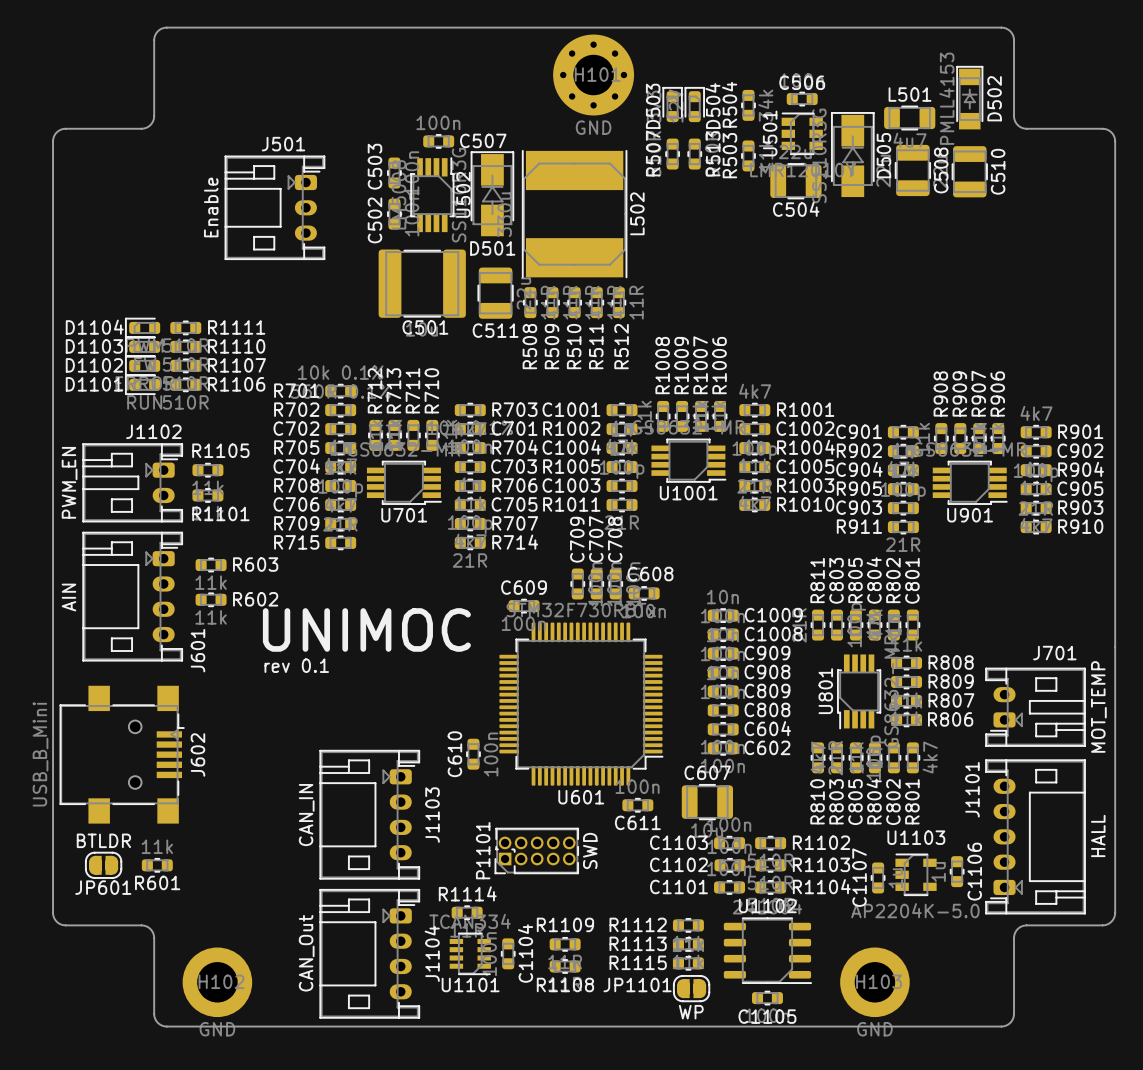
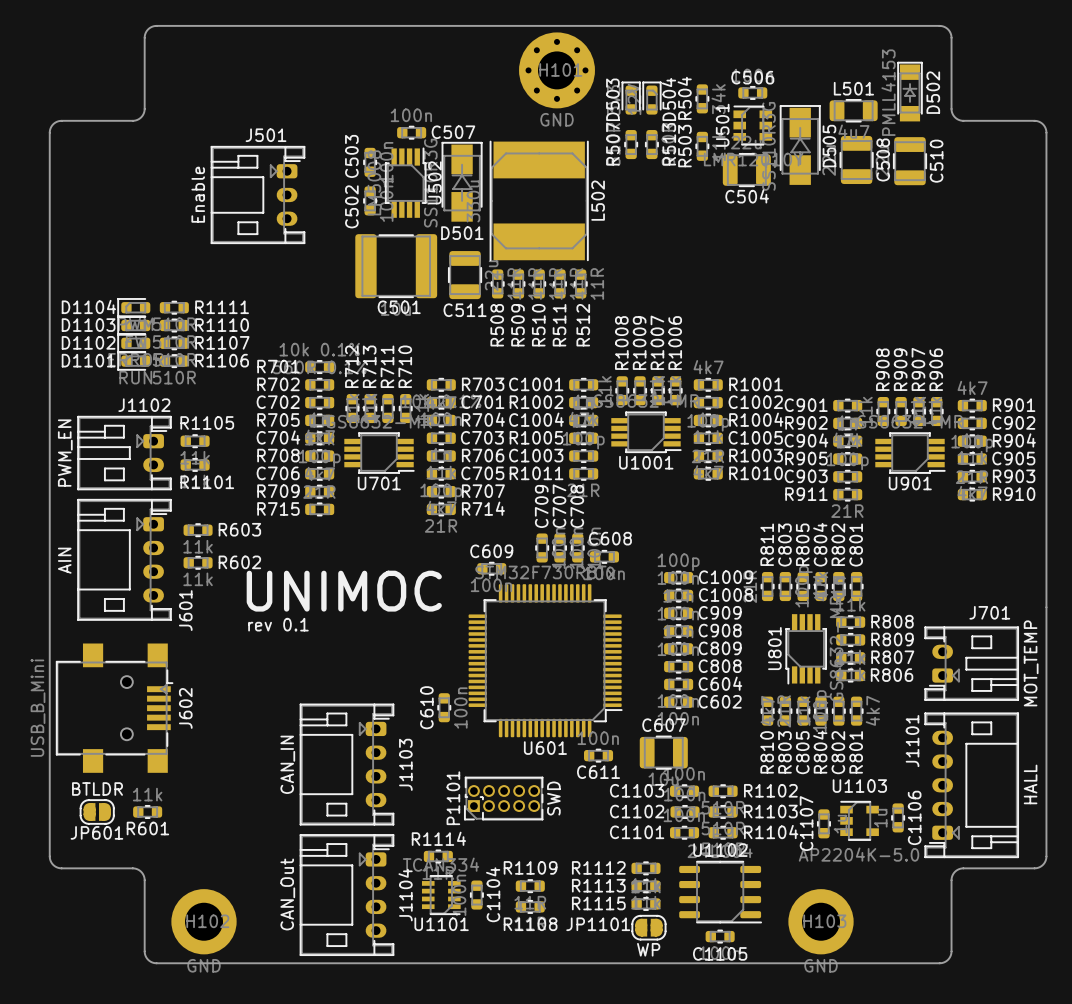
C1009 value: 10n (722, 597) -> 100p (678, 562)

